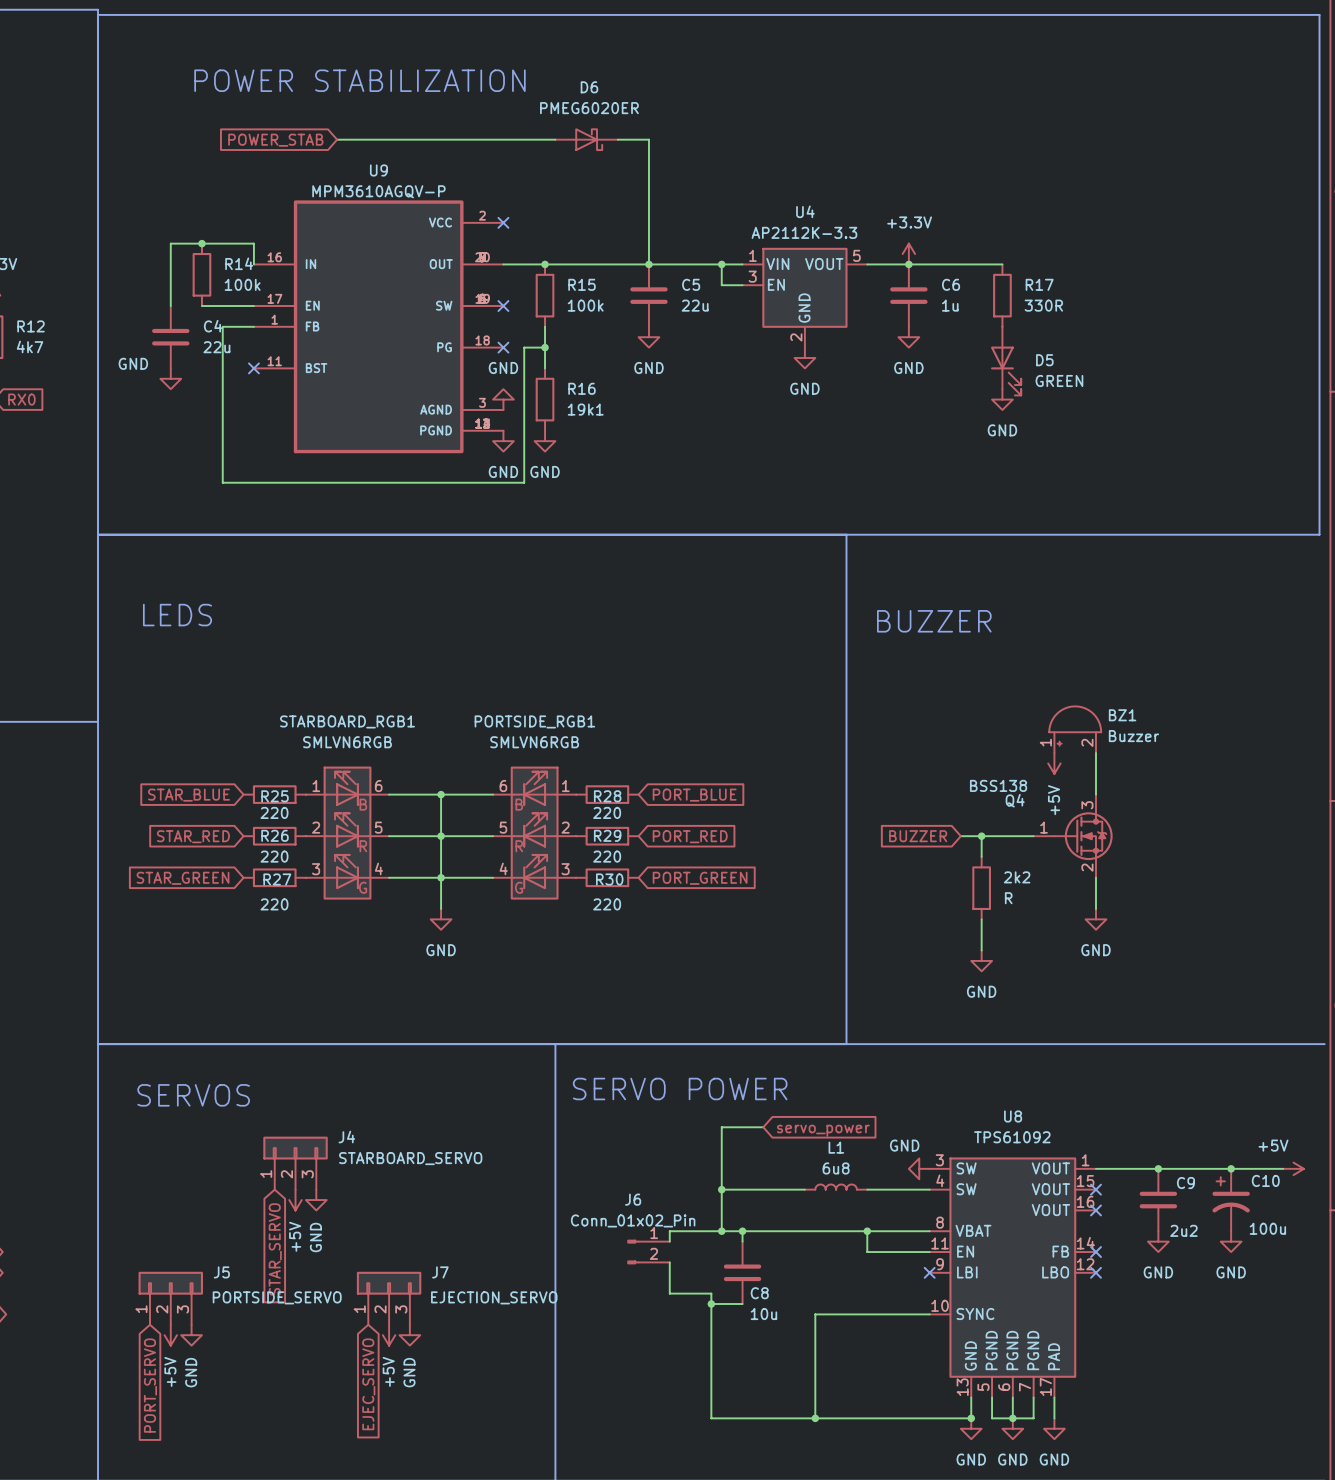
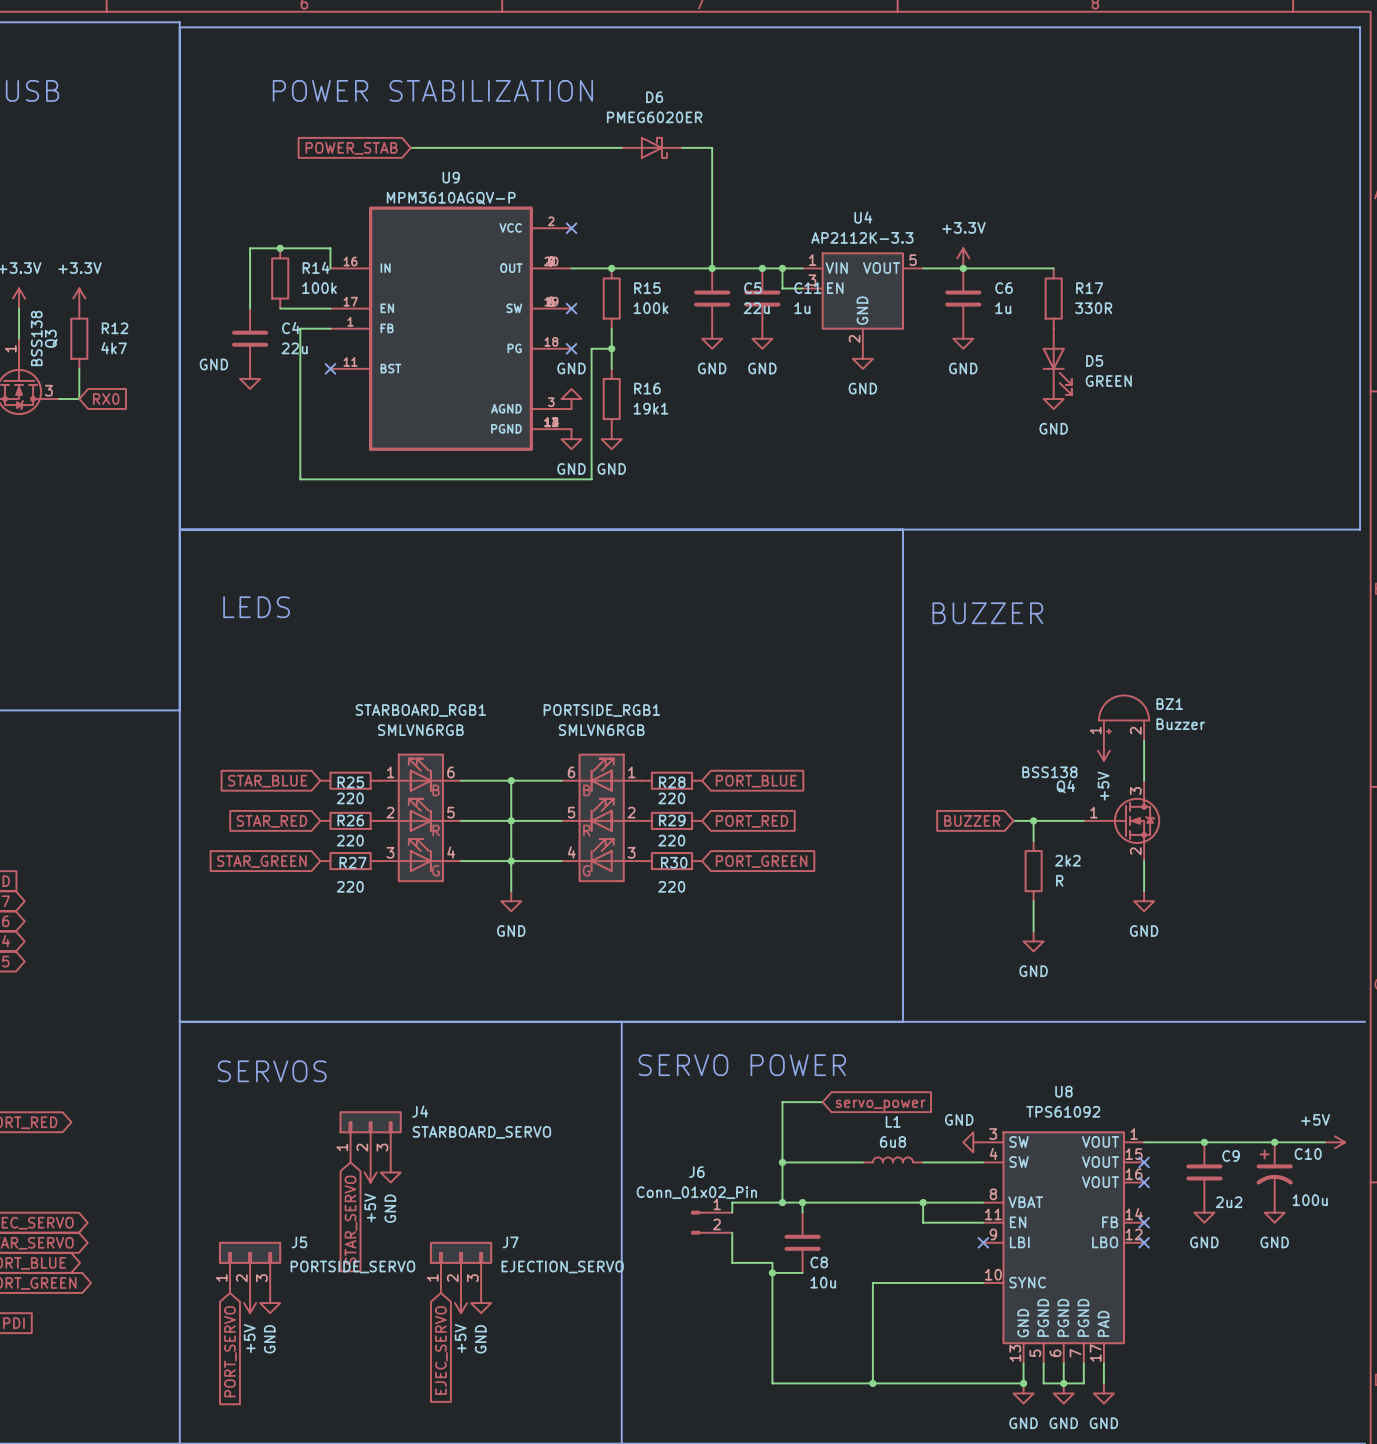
junction: none -> (762, 268)
C11: none -> 1u (762, 298)
power symbol: none -> GND (762, 338)

